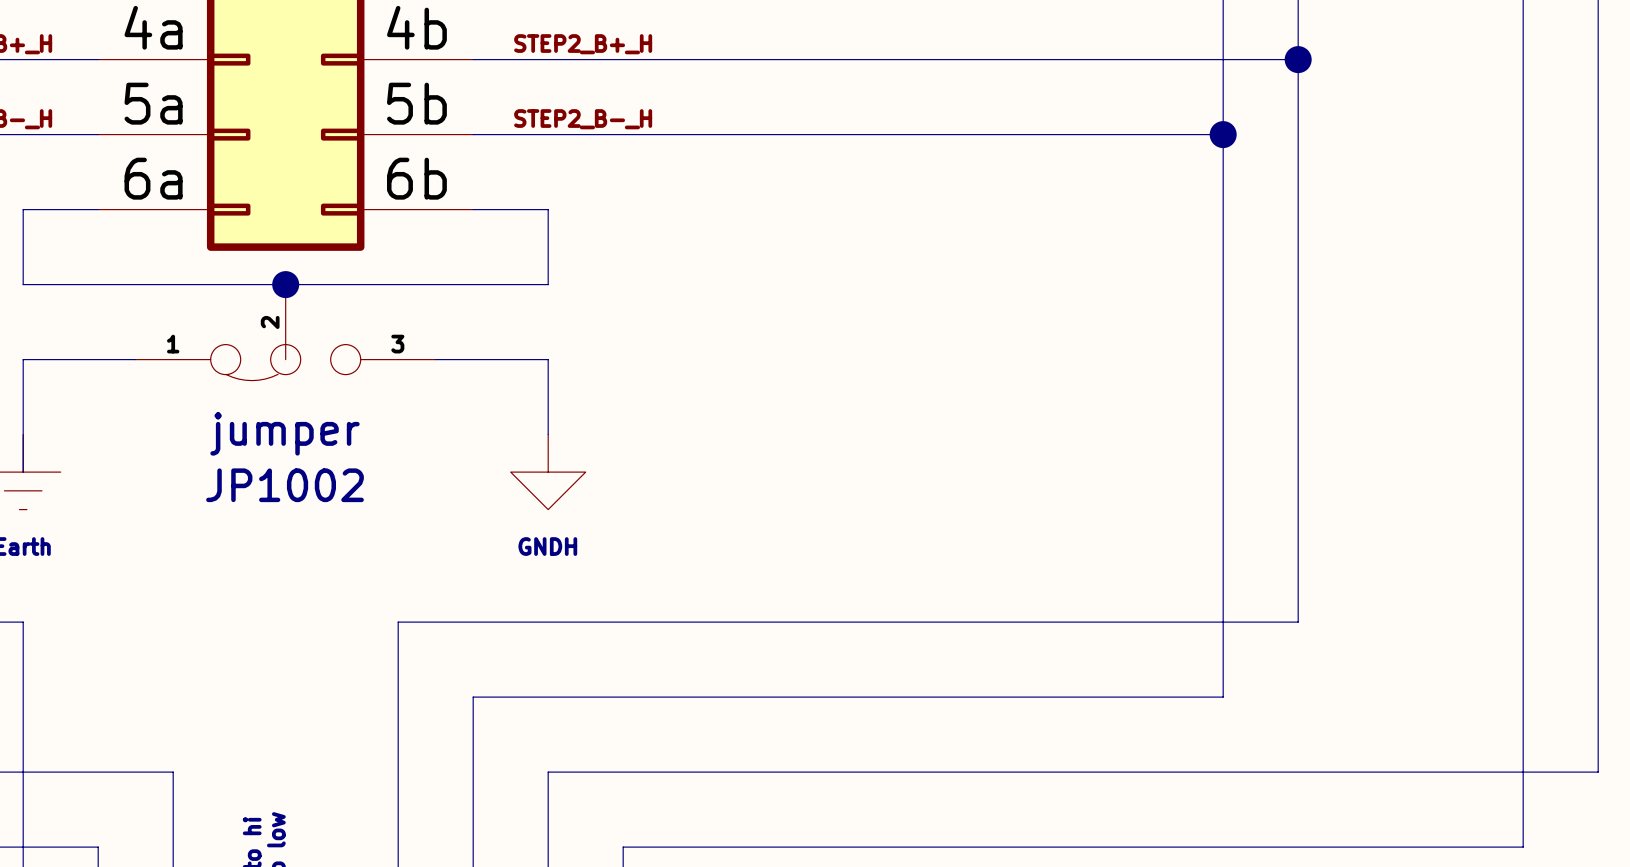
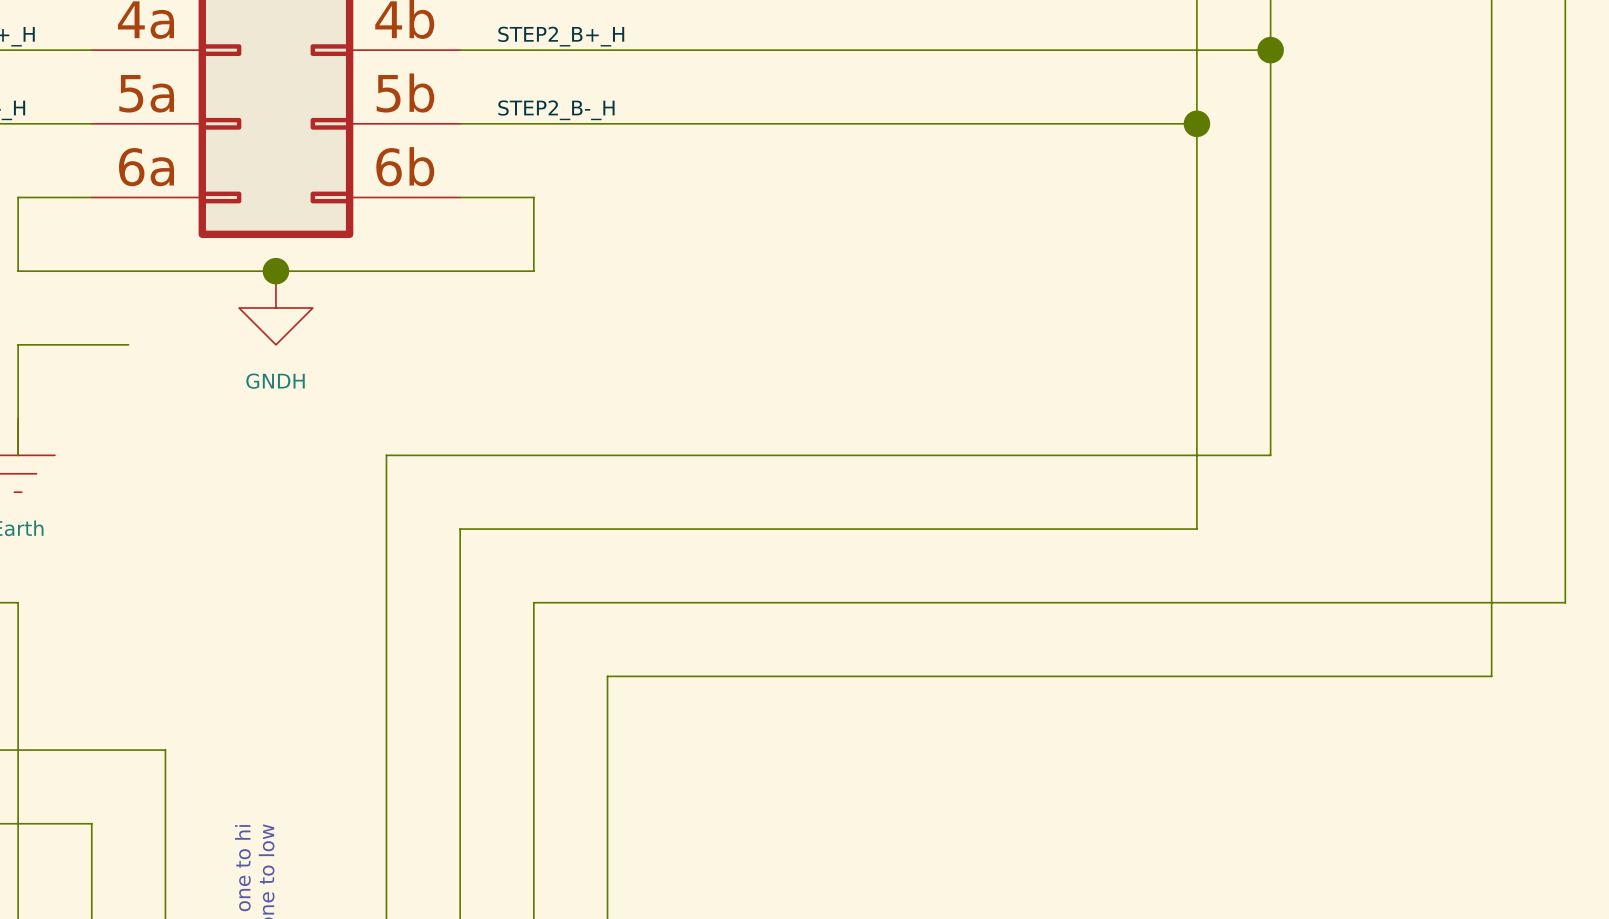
JP1002: jumper (285, 332) -> none
wire: (435, 359) (548, 359) (548, 434) -> none
power symbol position: GNDH (548, 472) -> GNDH (275, 308)
wire: (1298, 472) (1298, 622) -> (1565, 602) (1270, 602)
wire: none -> (1270, 455) (386, 455) (386, 602)
wire: (1223, 547) (1223, 697) -> (1491, 676) (1196, 676)
wire: none -> (1196, 529) (460, 529) (460, 676)
wire: (398, 622) (548, 622) -> (533, 750) (533, 602)
wire: (1598, 622) (1598, 772) (548, 772) -> none
wire: (473, 697) (623, 697) -> (607, 823) (607, 676)
wire: (1523, 697) (1523, 847) (623, 847) -> none

